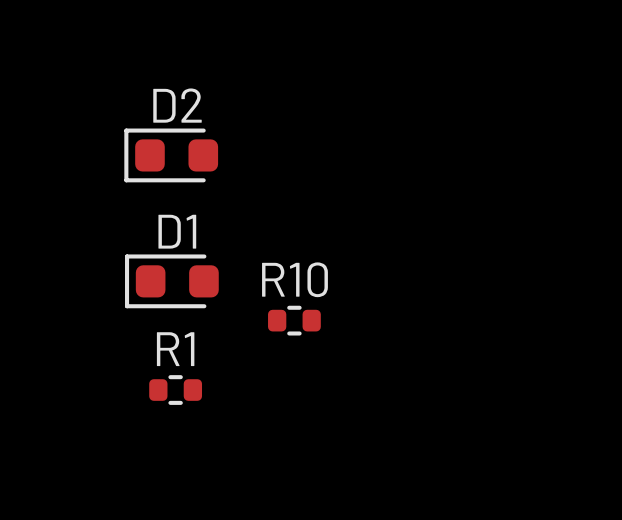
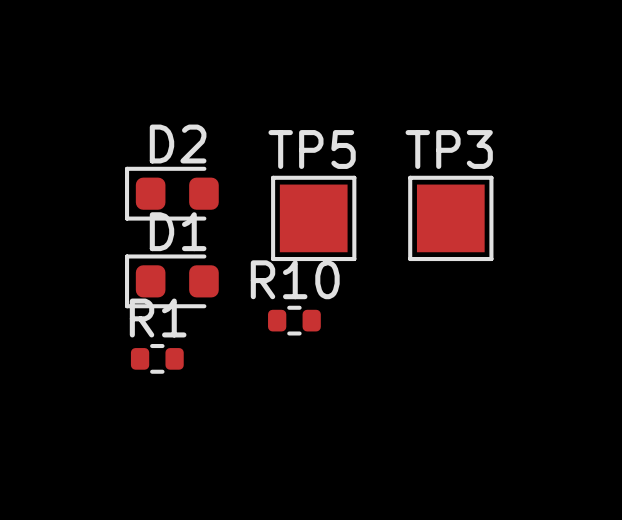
D2 position: (171, 155) -> (171, 193)
TP5: none -> (313, 218)
TP3: none -> (450, 218)
R1 position: (175, 390) -> (157, 358)

